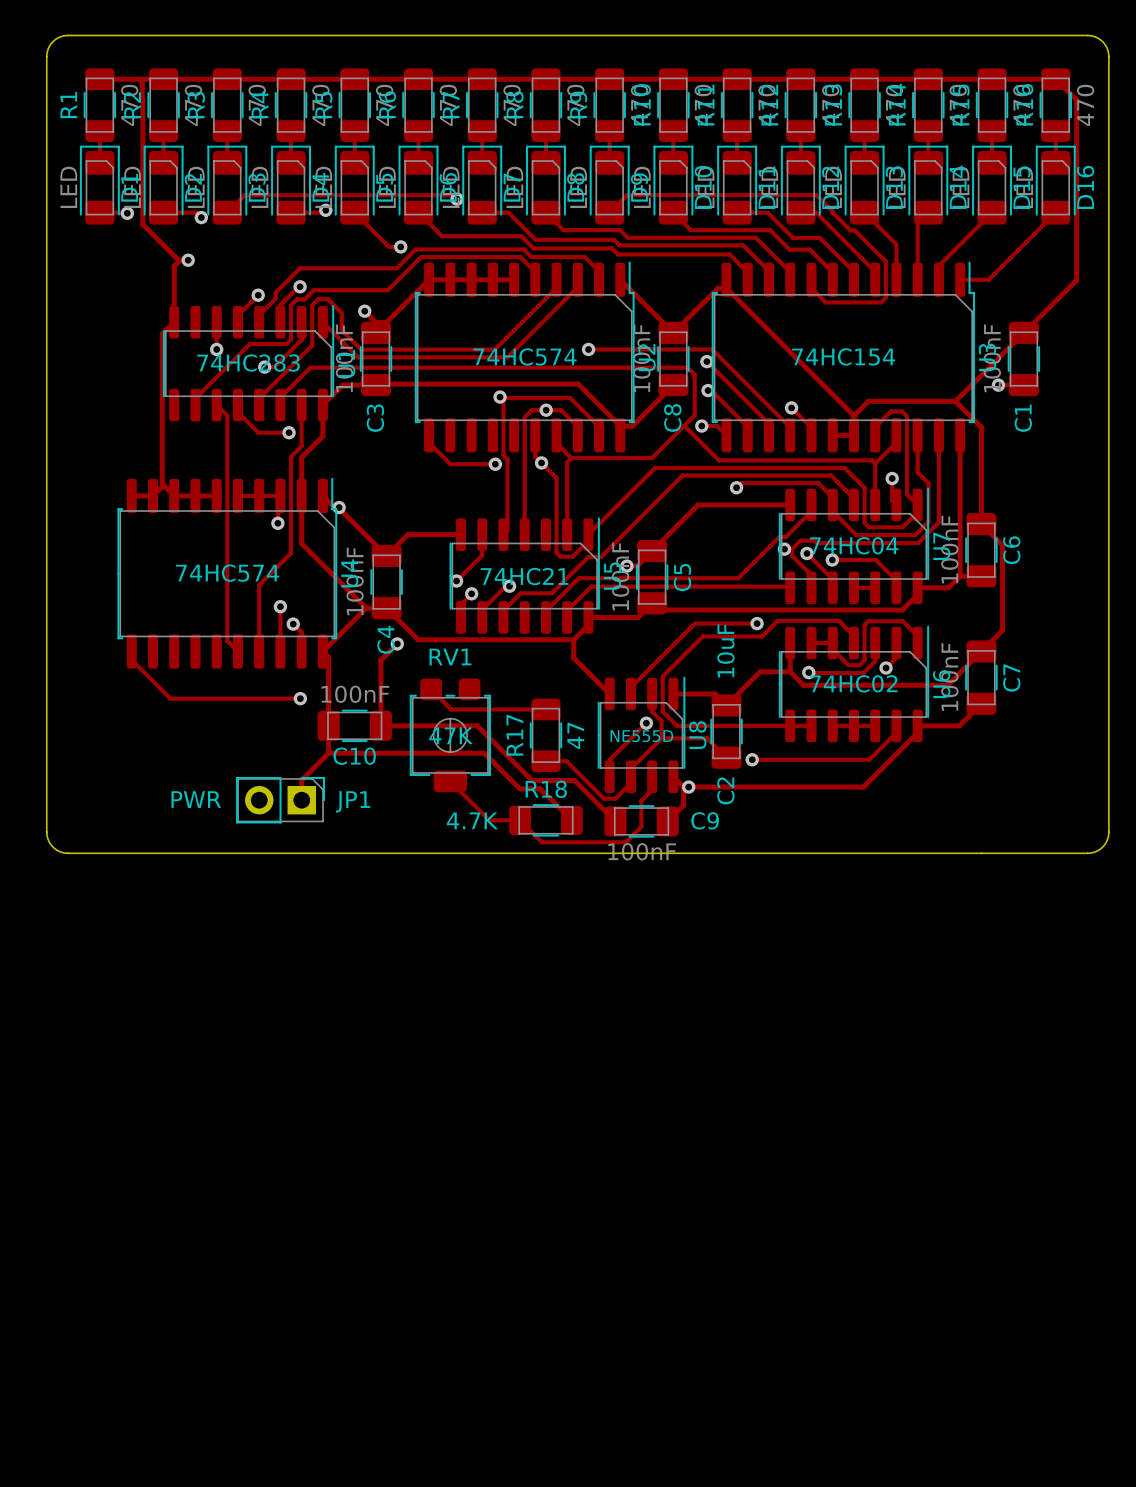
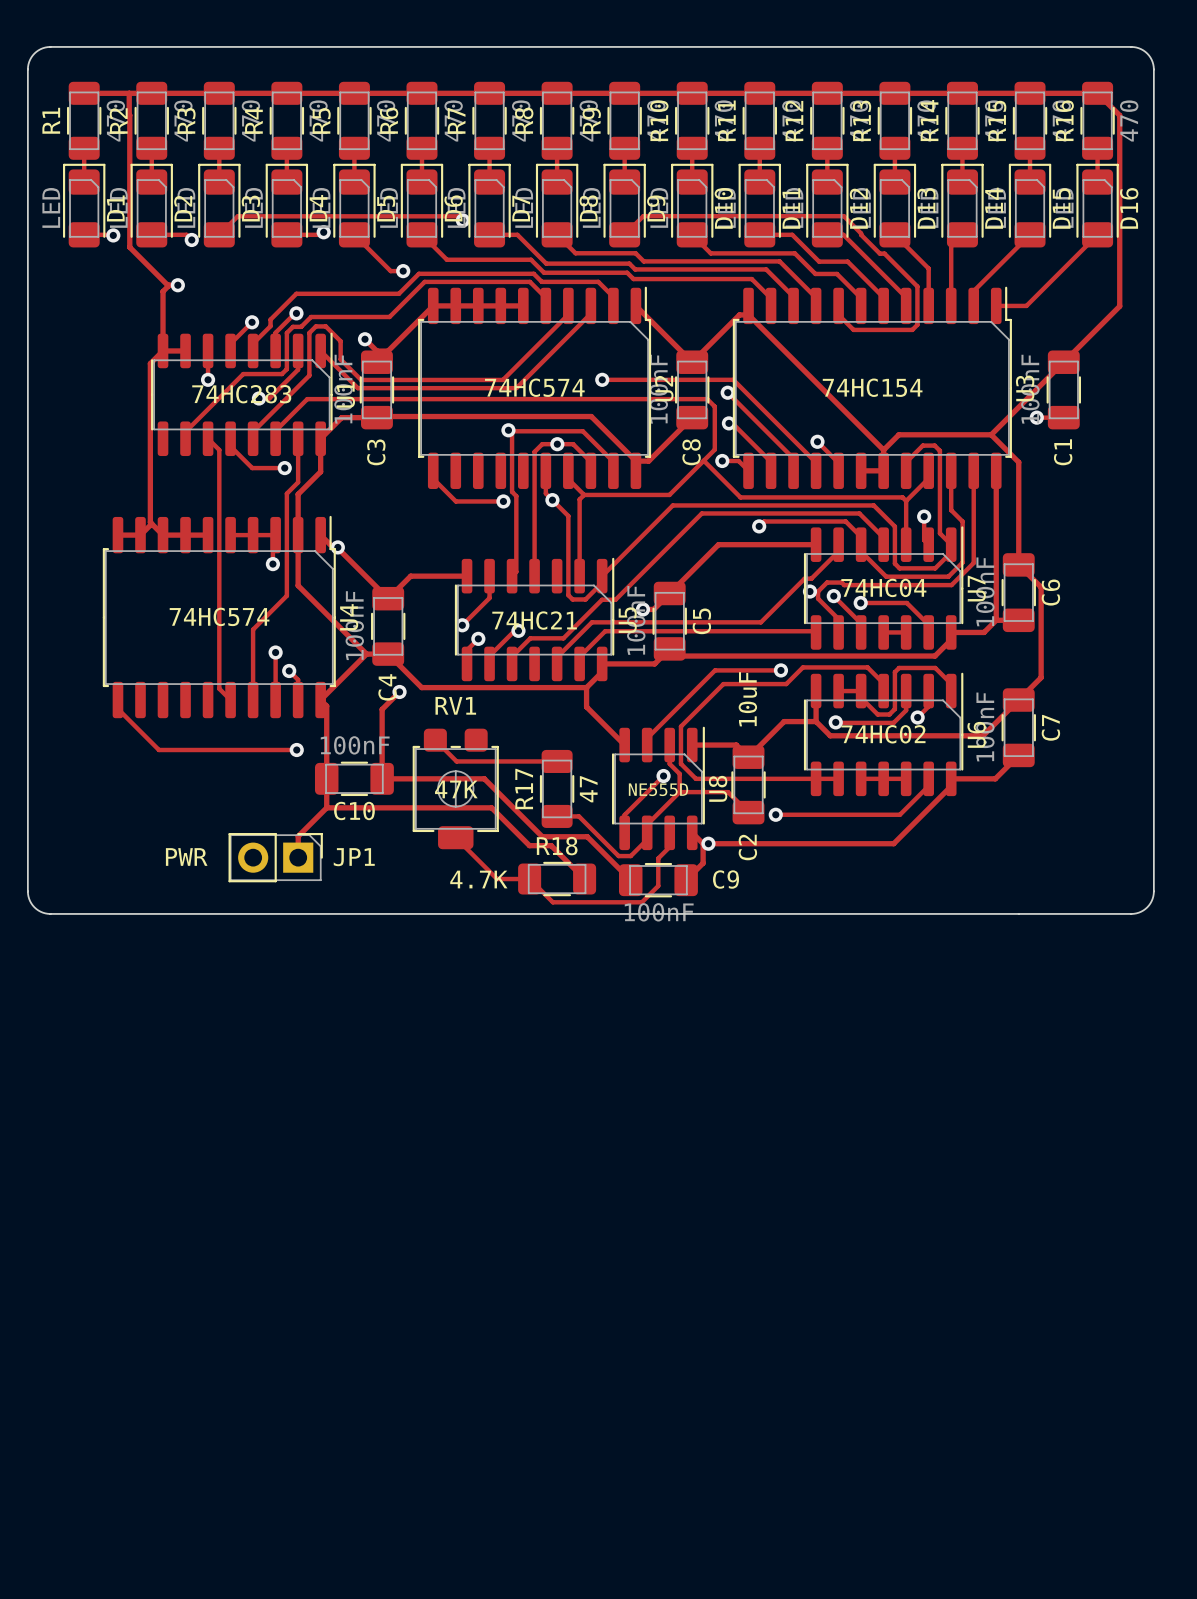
track: none -> (163, 350) (185, 350)

